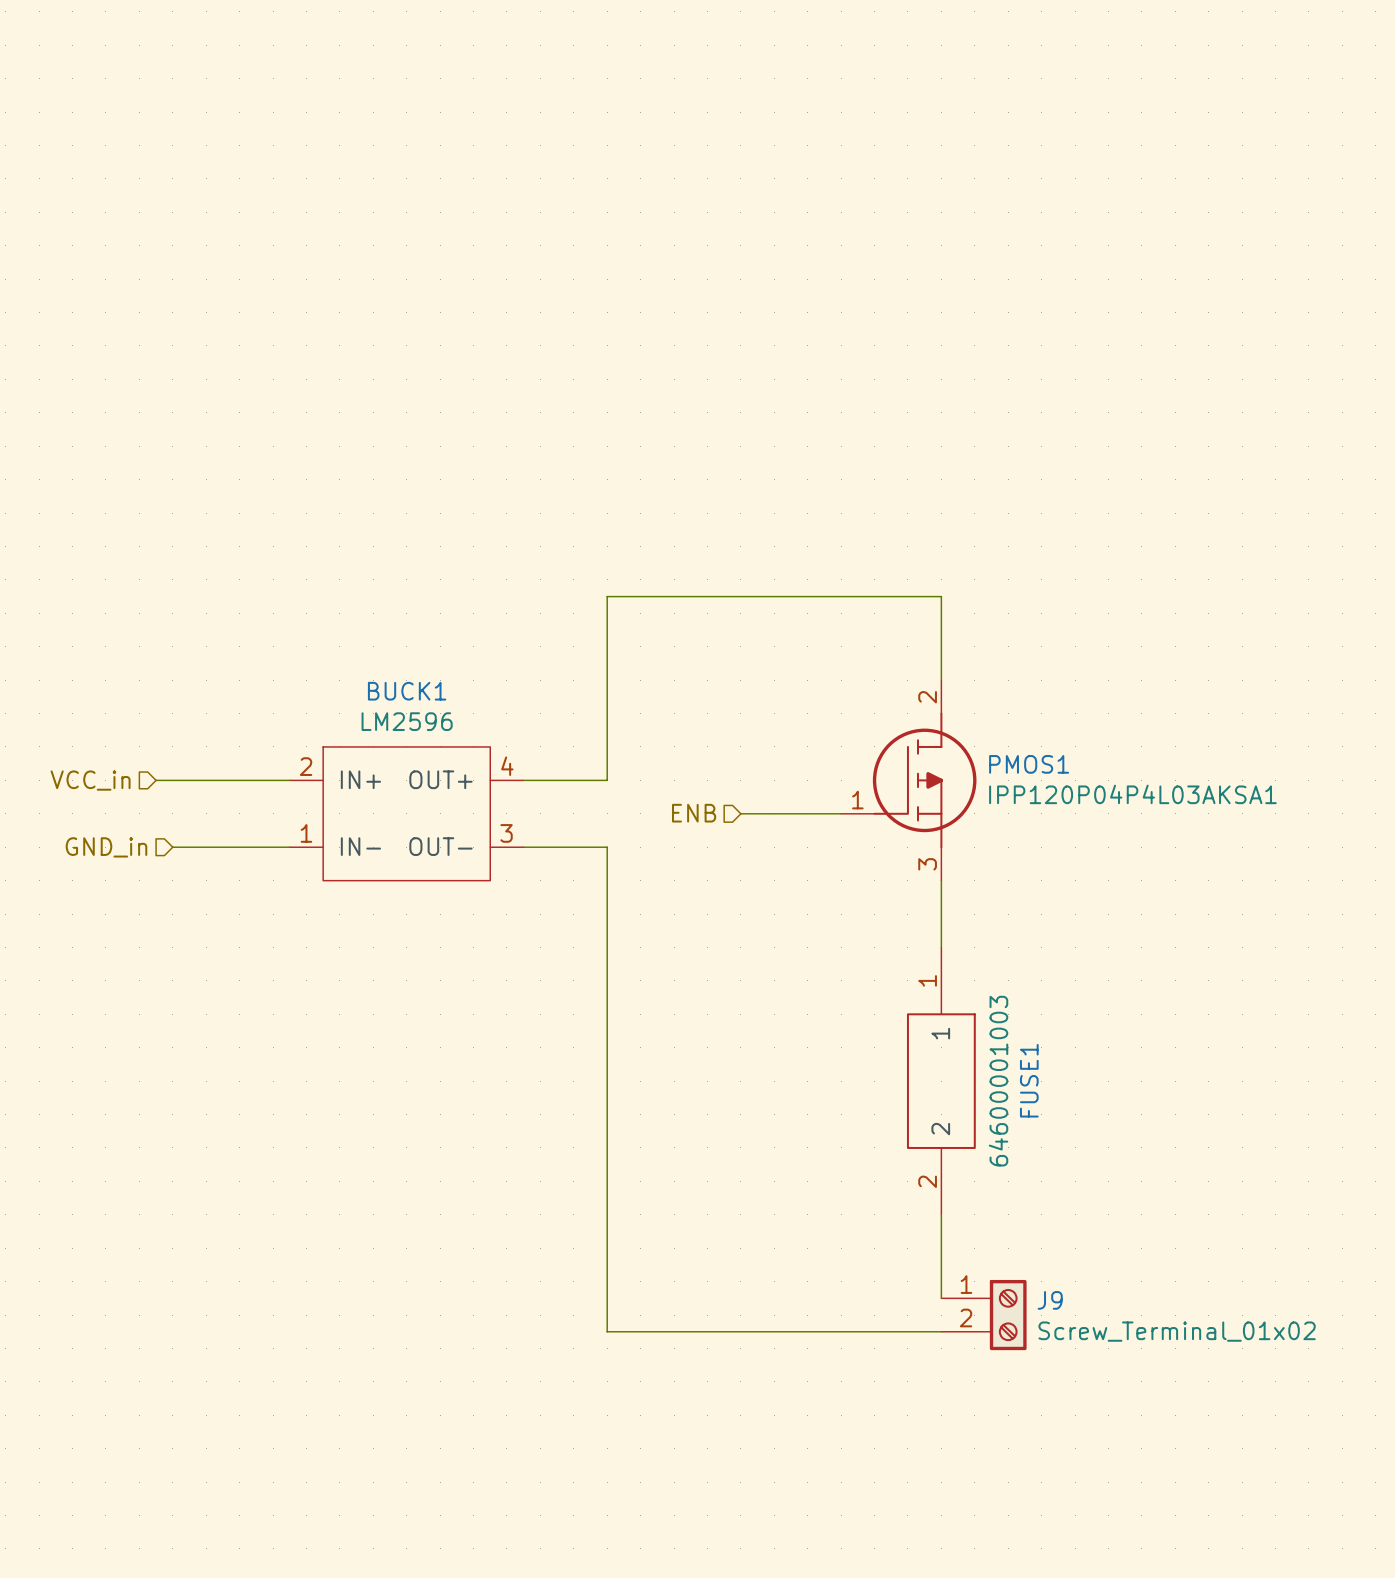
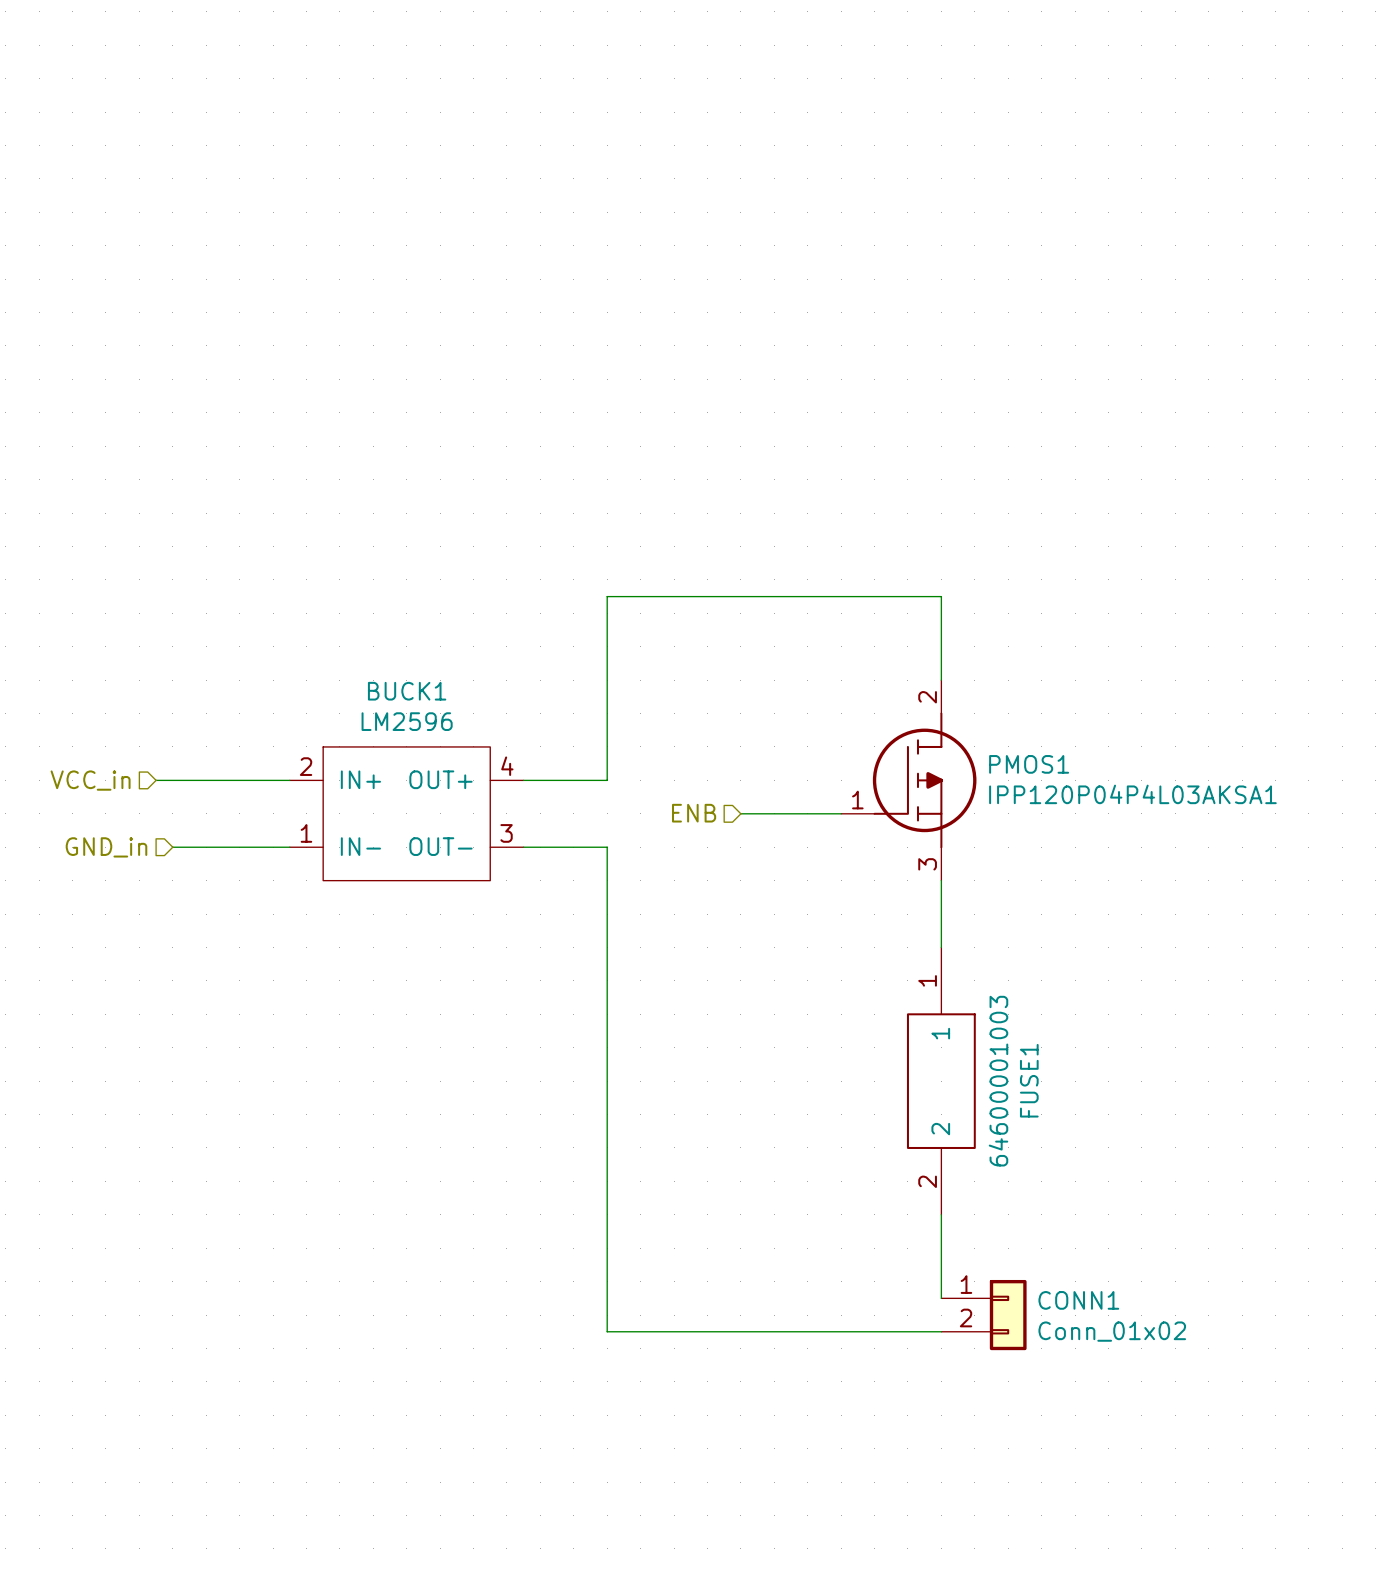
J9: Screw_Terminal_01x02 (983, 1315) -> none
CONN1: none -> Conn_01x02 (983, 1315)

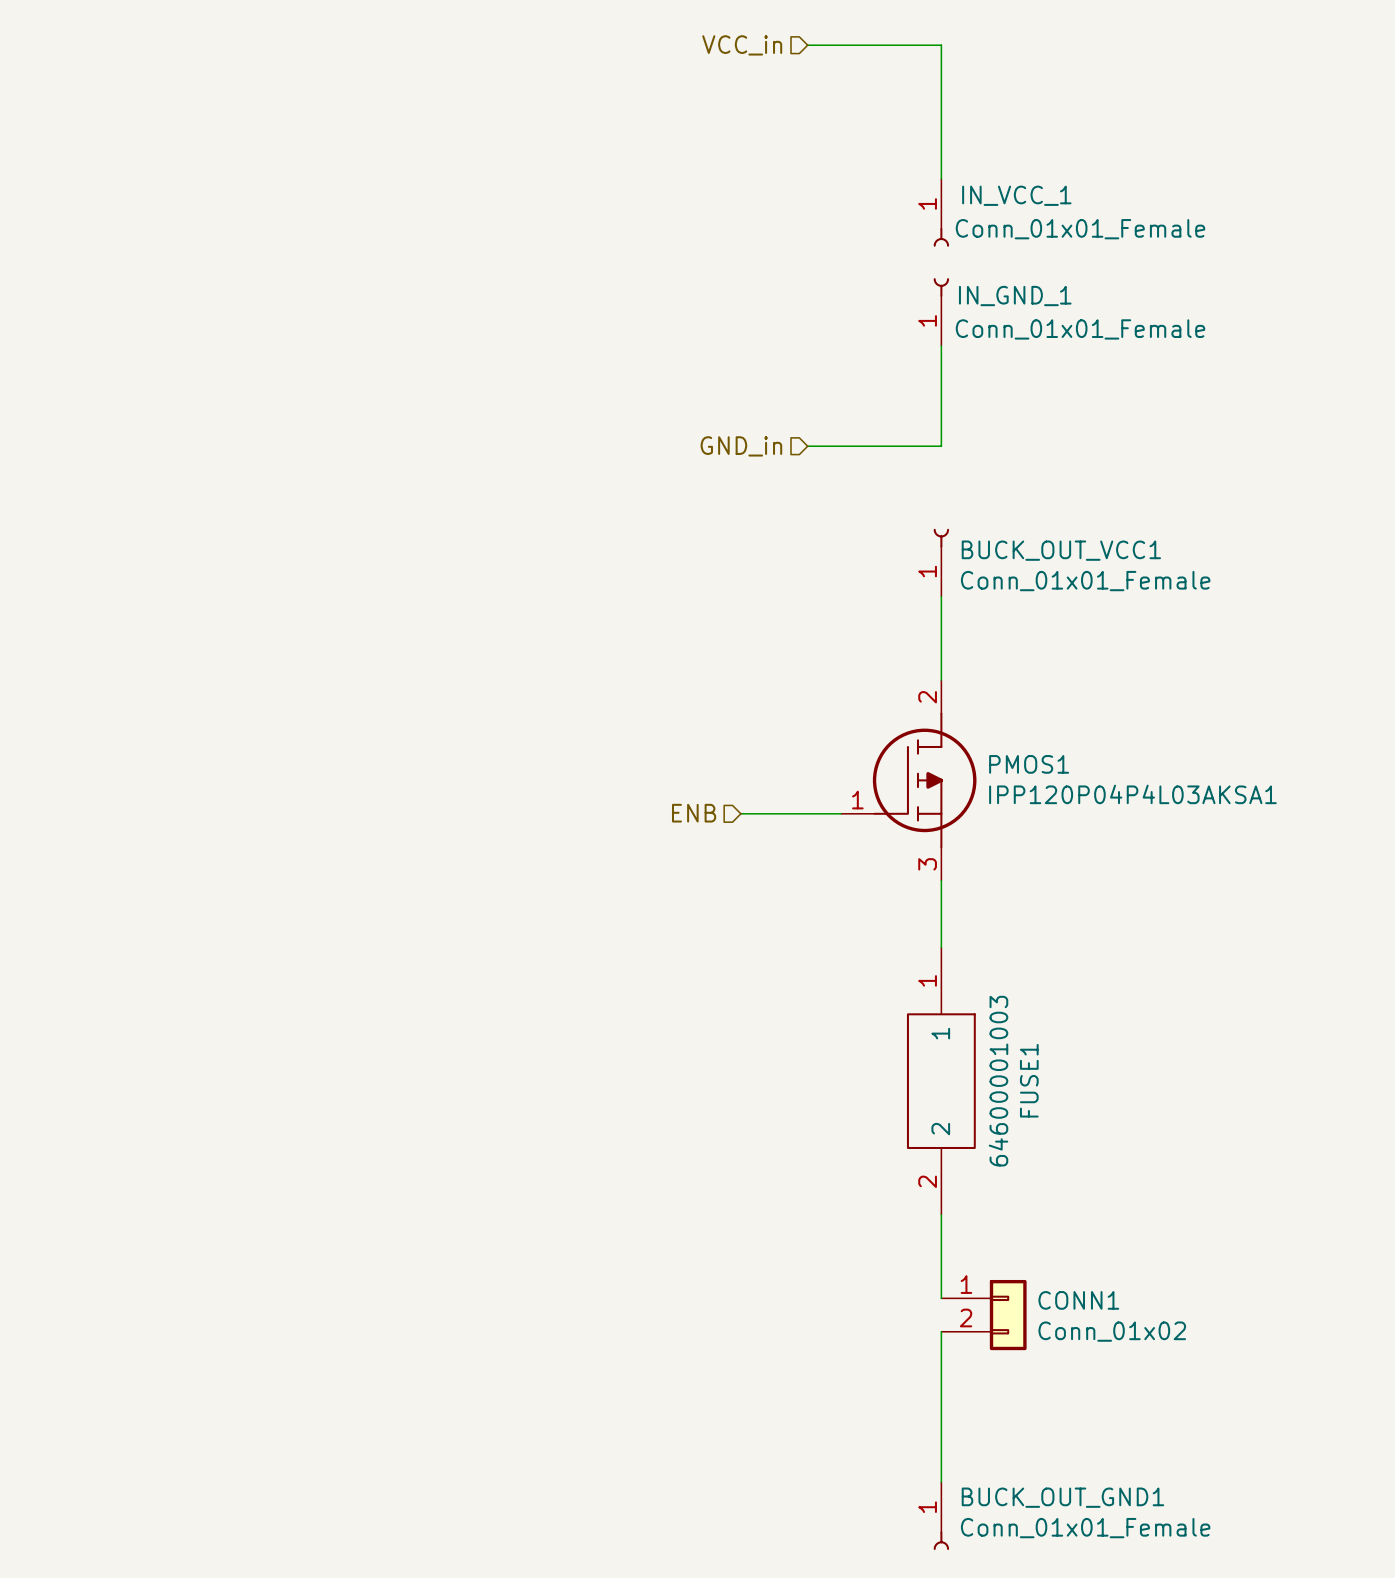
hierarchical label: none -> VCC_in (742, 45)
wire: none -> (807, 45) (941, 45) (941, 178)
IN_VCC_1: none -> Conn_01x01_Female (941, 212)
IN_GND_1: none -> Conn_01x01_Female (941, 312)
wire: none -> (941, 345) (941, 446) (807, 446)
hierarchical label: none -> GND_in (741, 446)
BUCK_OUT_VCC1: none -> Conn_01x01_Female (941, 562)
wire: (941, 596) (607, 596) (607, 780) (523, 780) -> none
hierarchical label: VCC_in (90, 780) -> none
wire: (156, 780) (289, 780) -> none
BUCK1: LM2596 (406, 813) -> none
hierarchical label: GND_in (106, 847) -> none
wire: (172, 847) (289, 847) -> none
wire: (523, 847) (607, 847) (607, 1331) (941, 1331) -> (941, 1482) (941, 1331)
BUCK_OUT_GND1: none -> Conn_01x01_Female (941, 1516)

